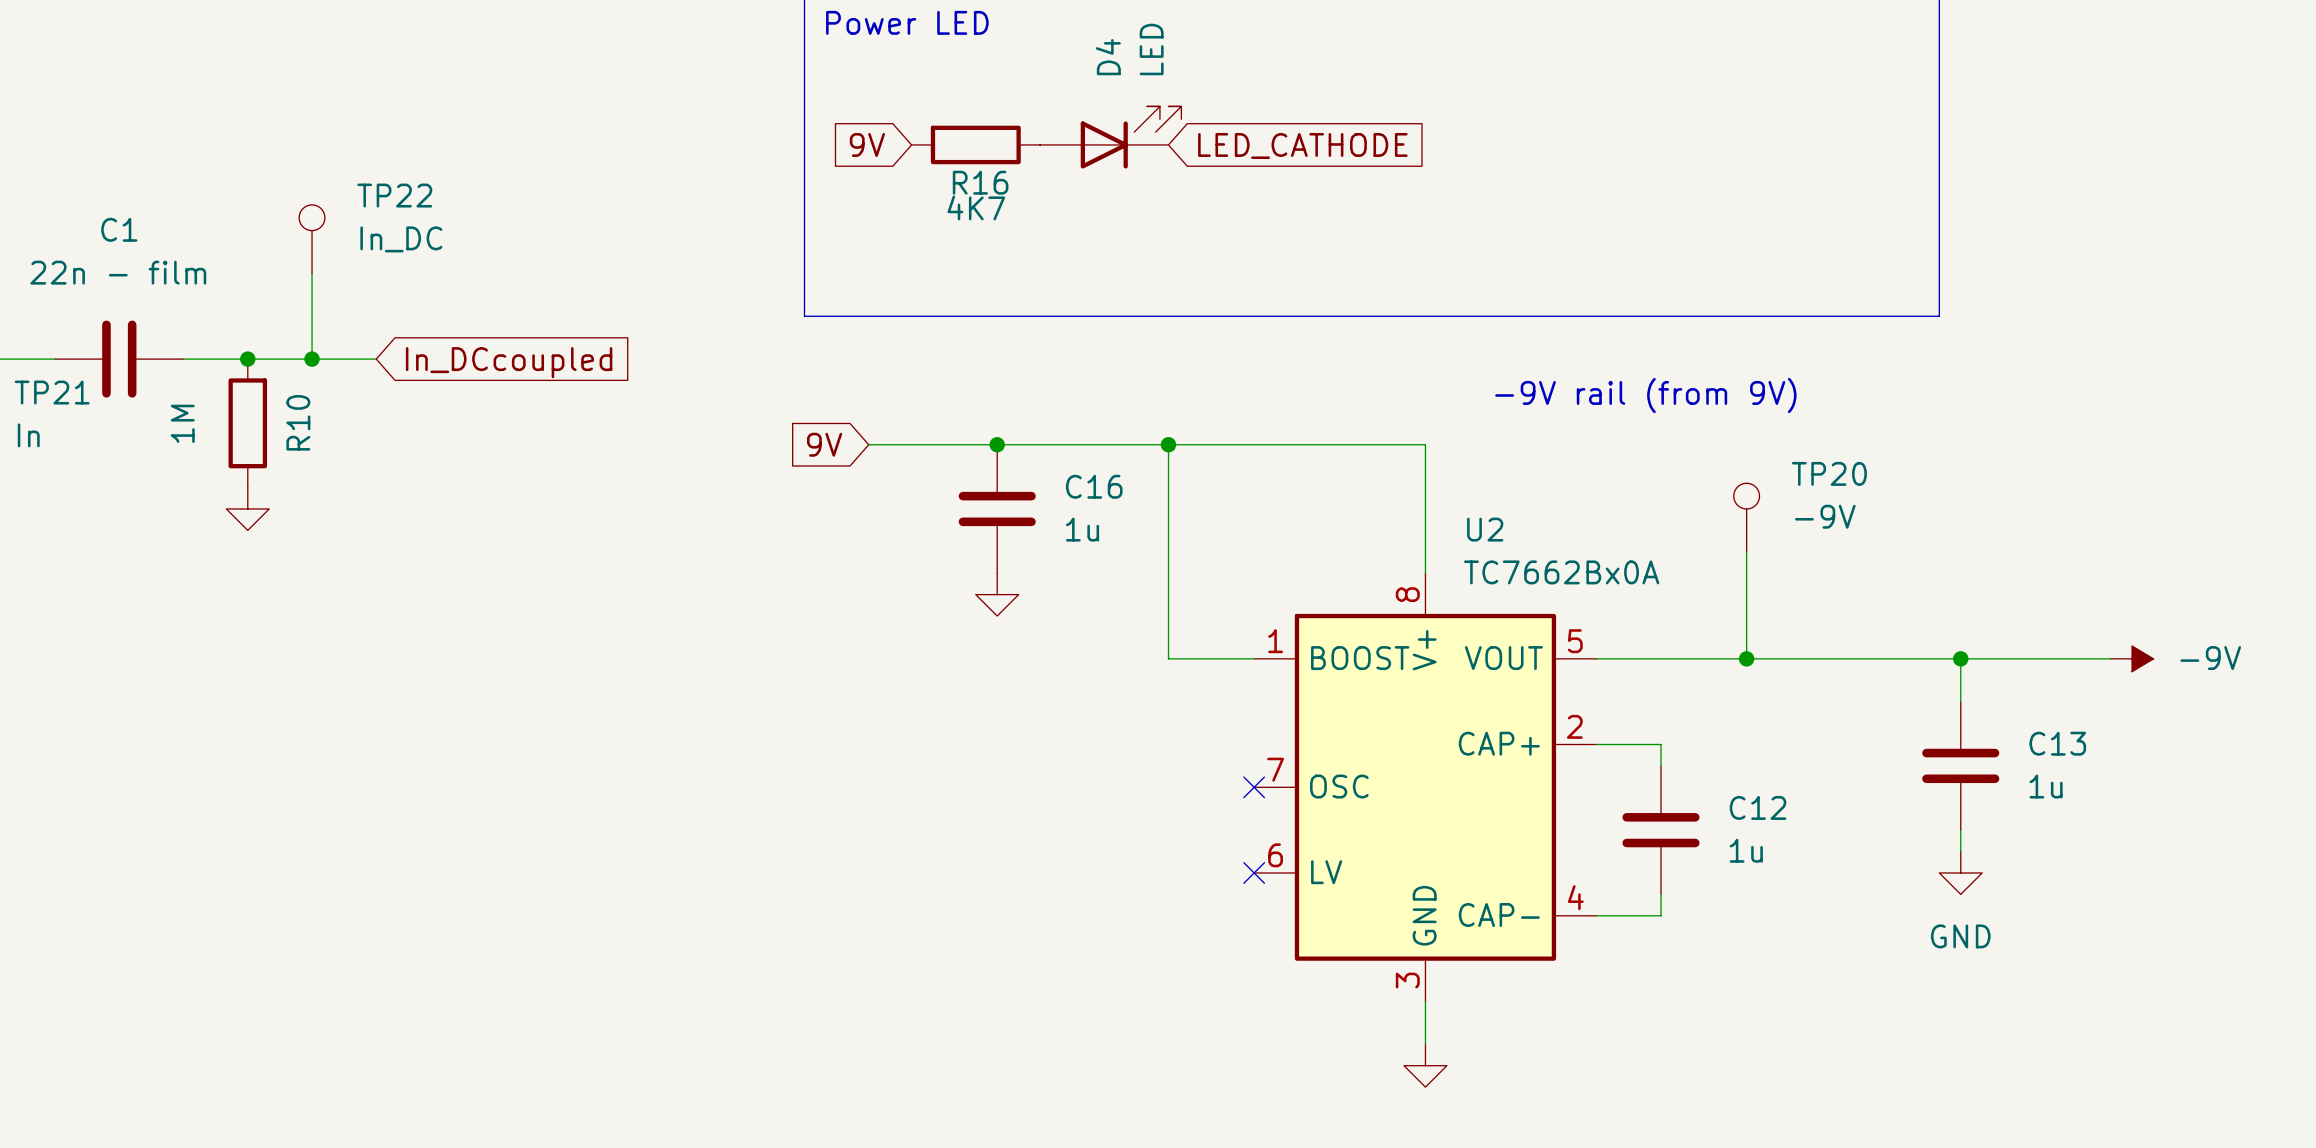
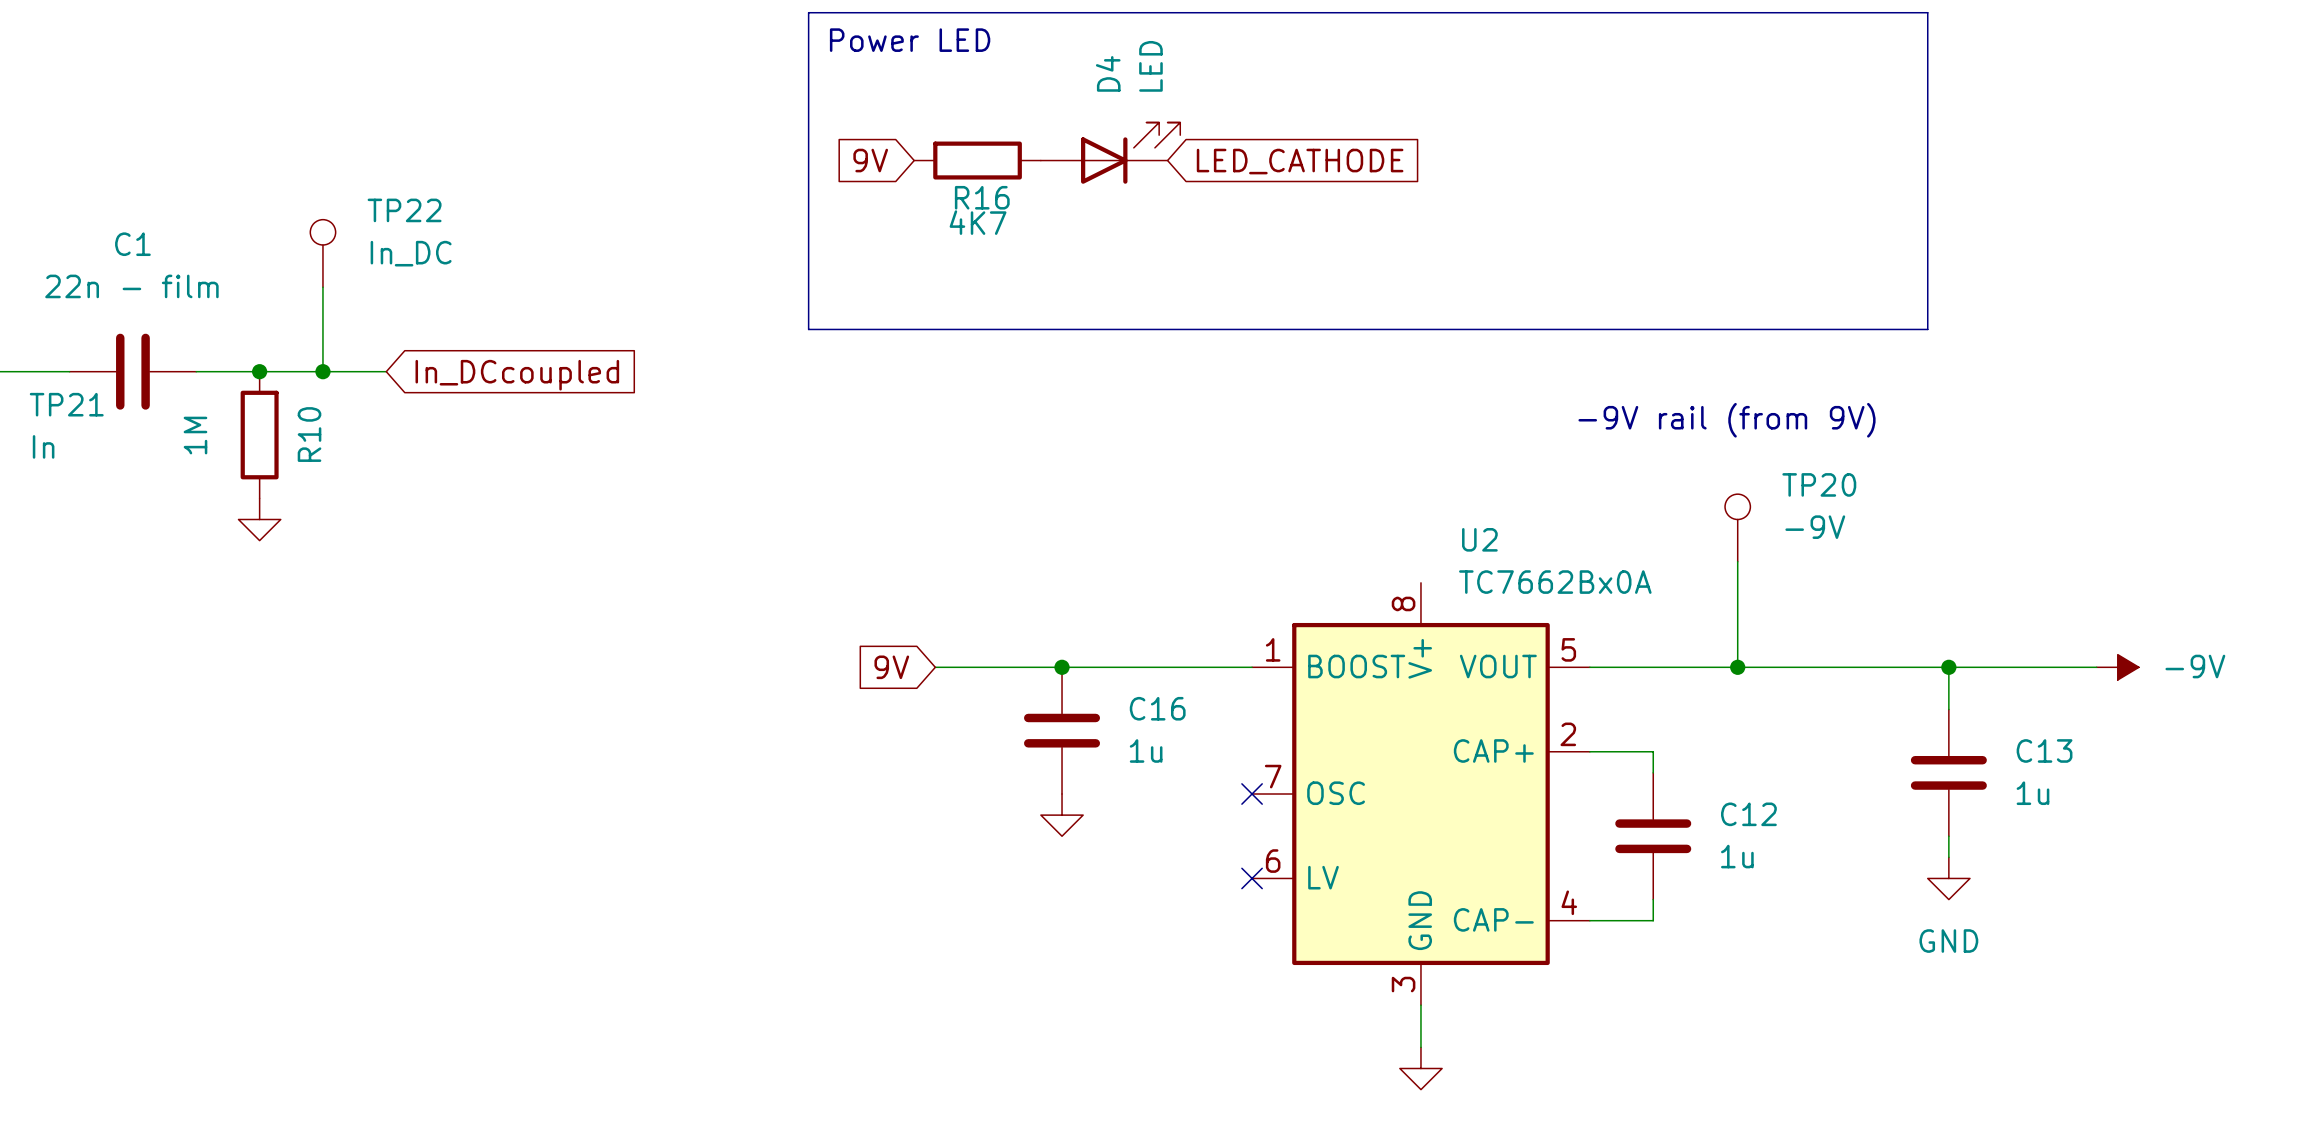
text position: -9V rail (from 9V) (1645, 395) -> -9V rail (from 9V) (1727, 420)
global label position: 9V (824, 444) -> 9V (891, 667)
wire: (868, 444) (1425, 444) (1425, 573) -> none
junction: (997, 444) -> none
wire: (1168, 444) (1168, 658) -> (935, 667) (1167, 667)
junction: (1168, 444) -> none
C16 position: (997, 508) -> (1062, 730)
power symbol position: (997, 594) -> (1062, 815)
junction: none -> (1062, 667)

